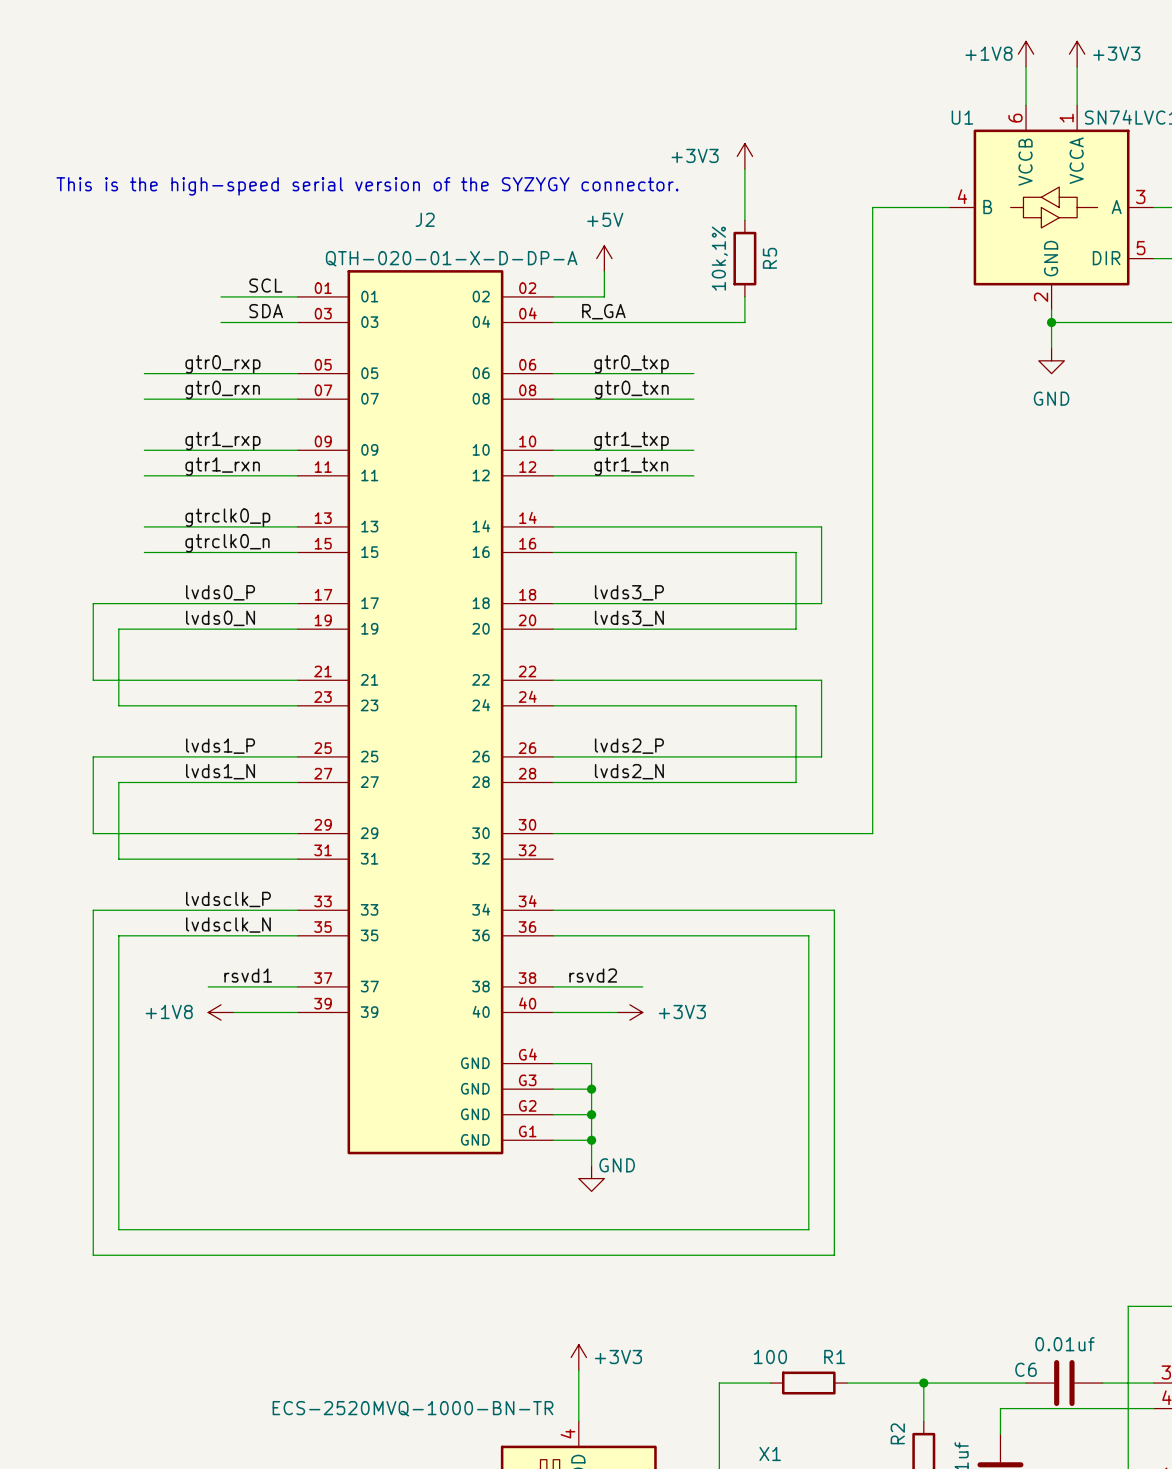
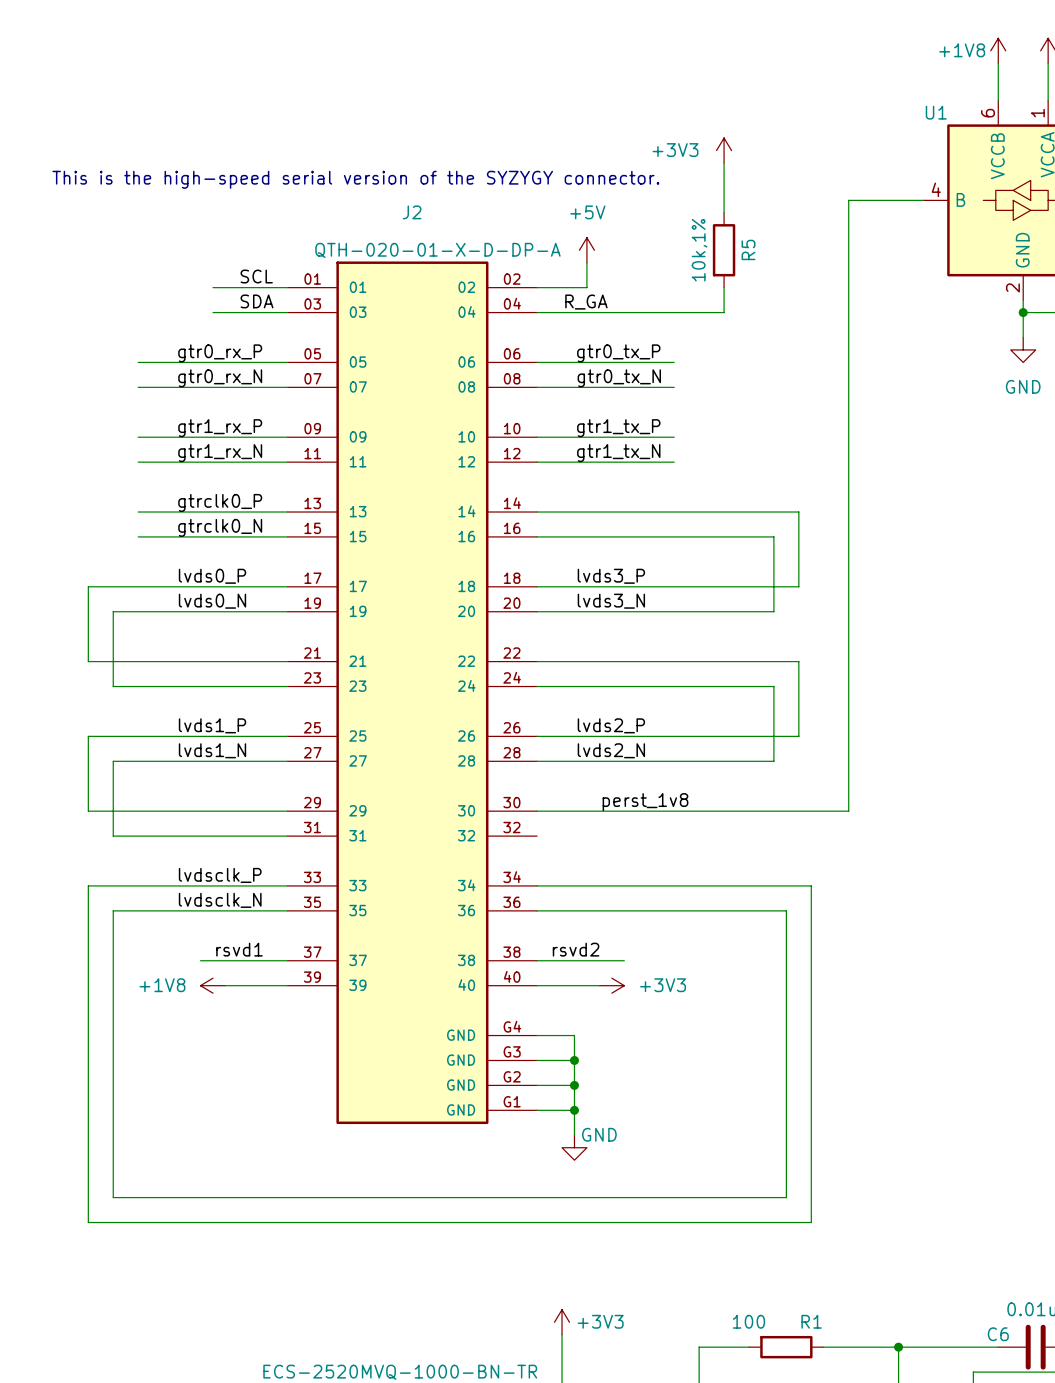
label: gtr0_rxp (222, 364) -> gtr0_rx_P (220, 353)
label: gtr0_txp (631, 364) -> gtr0_tx_P (618, 353)
label: gtr0_rxn (222, 389) -> gtr0_rx_N (220, 378)
label: gtr0_txn (631, 389) -> gtr0_tx_N (619, 378)
label: gtr1_rxp (222, 441) -> gtr1_rx_P (220, 428)
label: gtr1_txp (631, 441) -> gtr1_tx_P (618, 428)
label: gtr1_rxn (222, 466) -> gtr1_rx_N (220, 453)
label: gtr1_txn (631, 466) -> gtr1_tx_N (618, 453)
label: gtrclk0_p (227, 517) -> gtrclk0_P (220, 502)
label: gtrclk0_n (227, 543) -> gtrclk0_N (220, 527)
label: none -> perst_1v8 (645, 802)

